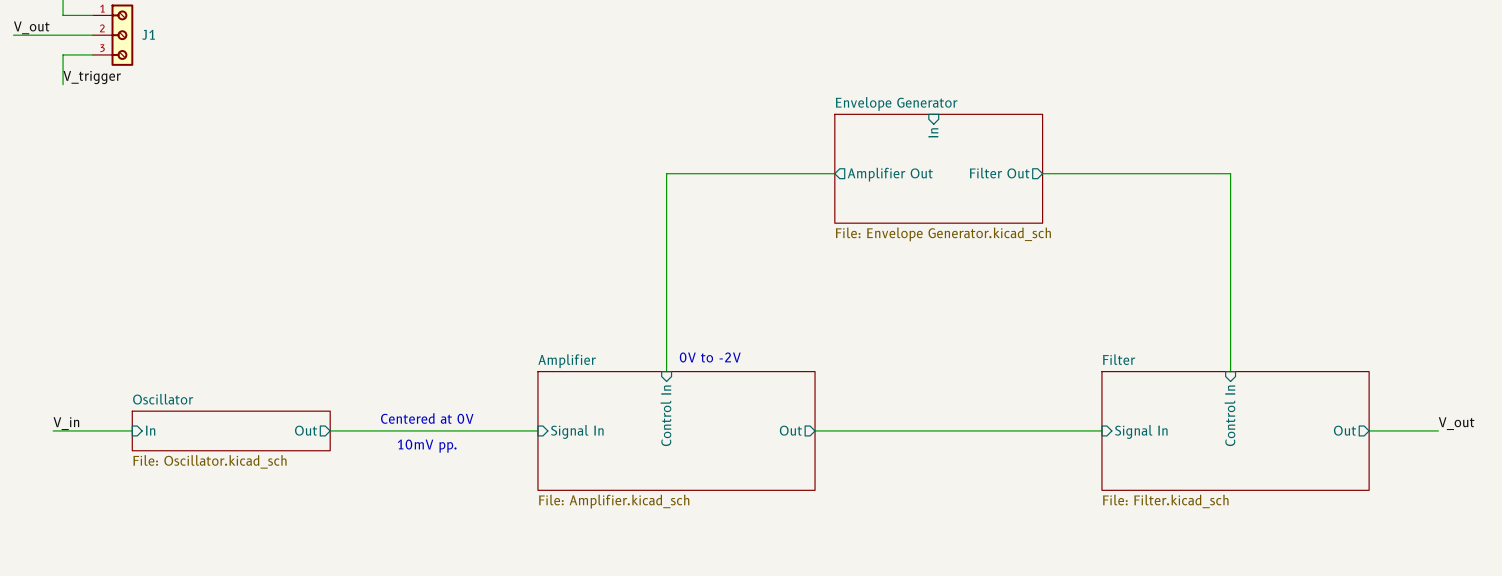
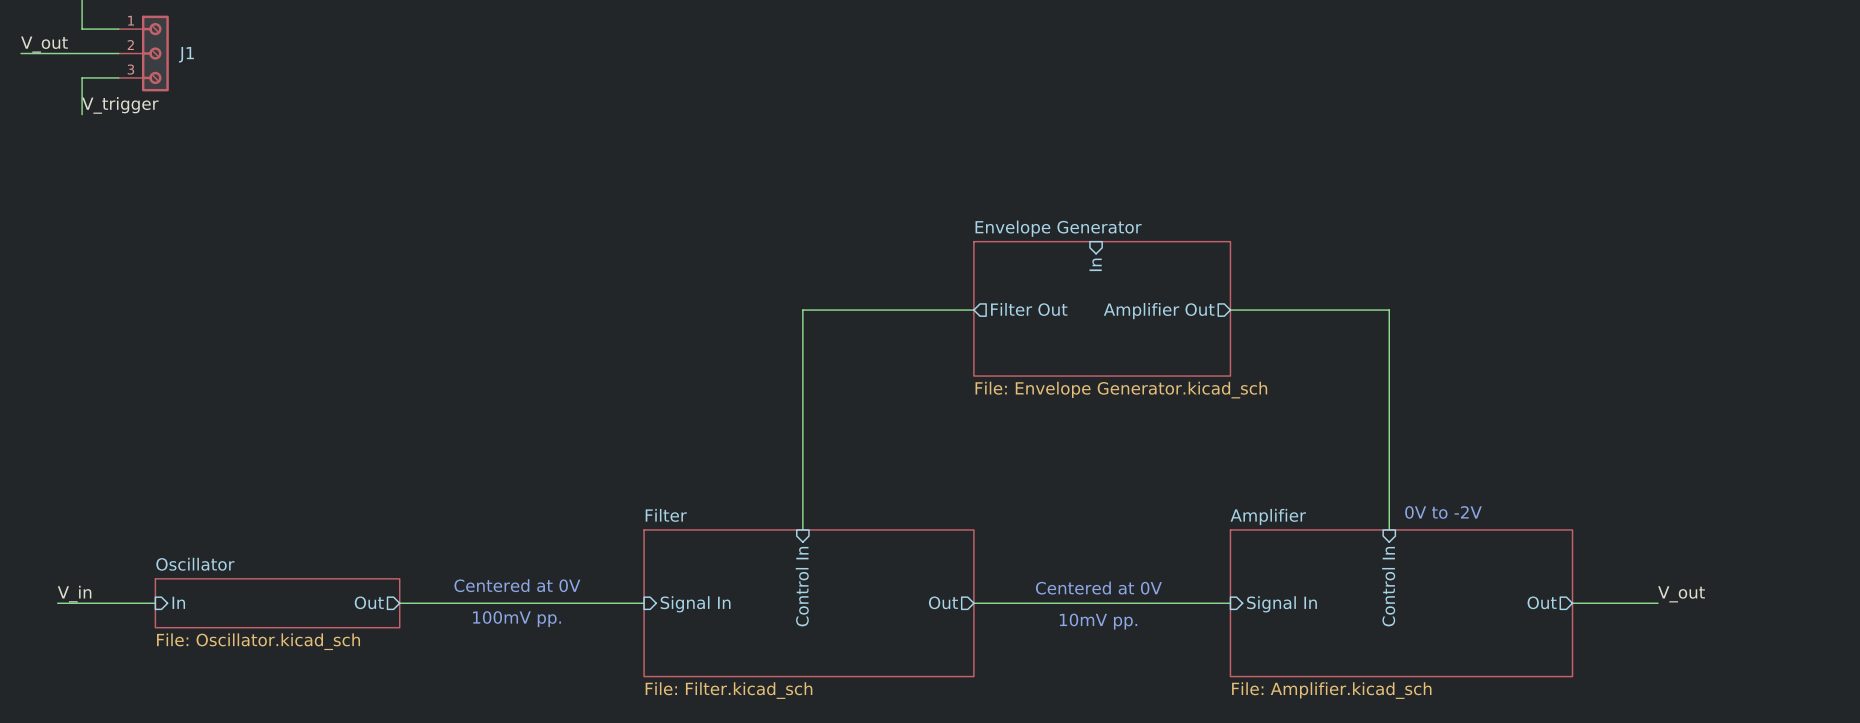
sheet pin position: In (933, 132) -> In (1095, 264)
sheet Envelope Generator position: (938, 168) -> (1102, 308)
wire: (834, 173) (666, 173) (666, 371) -> none
sheet pin: Filter Out (999, 173) -> none
wire: (1042, 173) (1230, 173) (1230, 371) -> none
sheet pin rotation: 0° (890, 174) -> 180° (1159, 311)
wire: none -> (973, 310) (802, 310) (802, 529)
sheet pin: none -> Filter Out (1029, 309)
wire: none -> (1230, 310) (1389, 310) (1389, 529)
text: 0V to -2V (710, 357) -> none
text: none -> 0V to -2V (1443, 512)
sheet pin position: Control In (665, 415) -> Control In (802, 586)
sheet pin position: Control In (1229, 415) -> Control In (1388, 586)
text position: Centered at 0V (427, 418) -> Centered at 0V (517, 585)
label position: V_in (66, 423) -> V_in (74, 594)
label position: V_out (1456, 423) -> V_out (1681, 594)
wire: (53, 430) (132, 430) -> (57, 603) (155, 603)
sheet pin position: In (150, 430) -> In (178, 602)
sheet Oscillator position: (231, 430) -> (277, 603)
sheet pin position: Out (306, 430) -> Out (369, 602)
wire: (330, 430) (537, 430) -> none
sheet Amplifier: File: Amplifier.kicad_sch (676, 430) -> none
sheet pin position: Out (790, 430) -> Out (943, 602)
wire: (815, 430) (1101, 430) -> none
sheet Filter: File: Filter.kicad_sch (1235, 430) -> none
sheet pin position: Out (1345, 430) -> Out (1542, 602)
wire: (1369, 430) (1438, 430) -> (1572, 603) (1658, 603)
sheet pin position: Signal In (577, 431) -> Signal In (695, 604)
sheet pin position: Signal In (1141, 431) -> Signal In (1281, 604)
text: 10mV pp. (427, 446) -> none
text: none -> Centered at 0V (1098, 588)
wire: none -> (399, 603) (644, 603)
sheet Filter: none -> File: Filter.kicad_sch (808, 603)
wire: none -> (973, 603) (1230, 603)
sheet Amplifier: none -> File: Amplifier.kicad_sch (1401, 603)
text: none -> 100mV pp. (517, 619)
text: none -> 10mV pp. (1098, 621)

